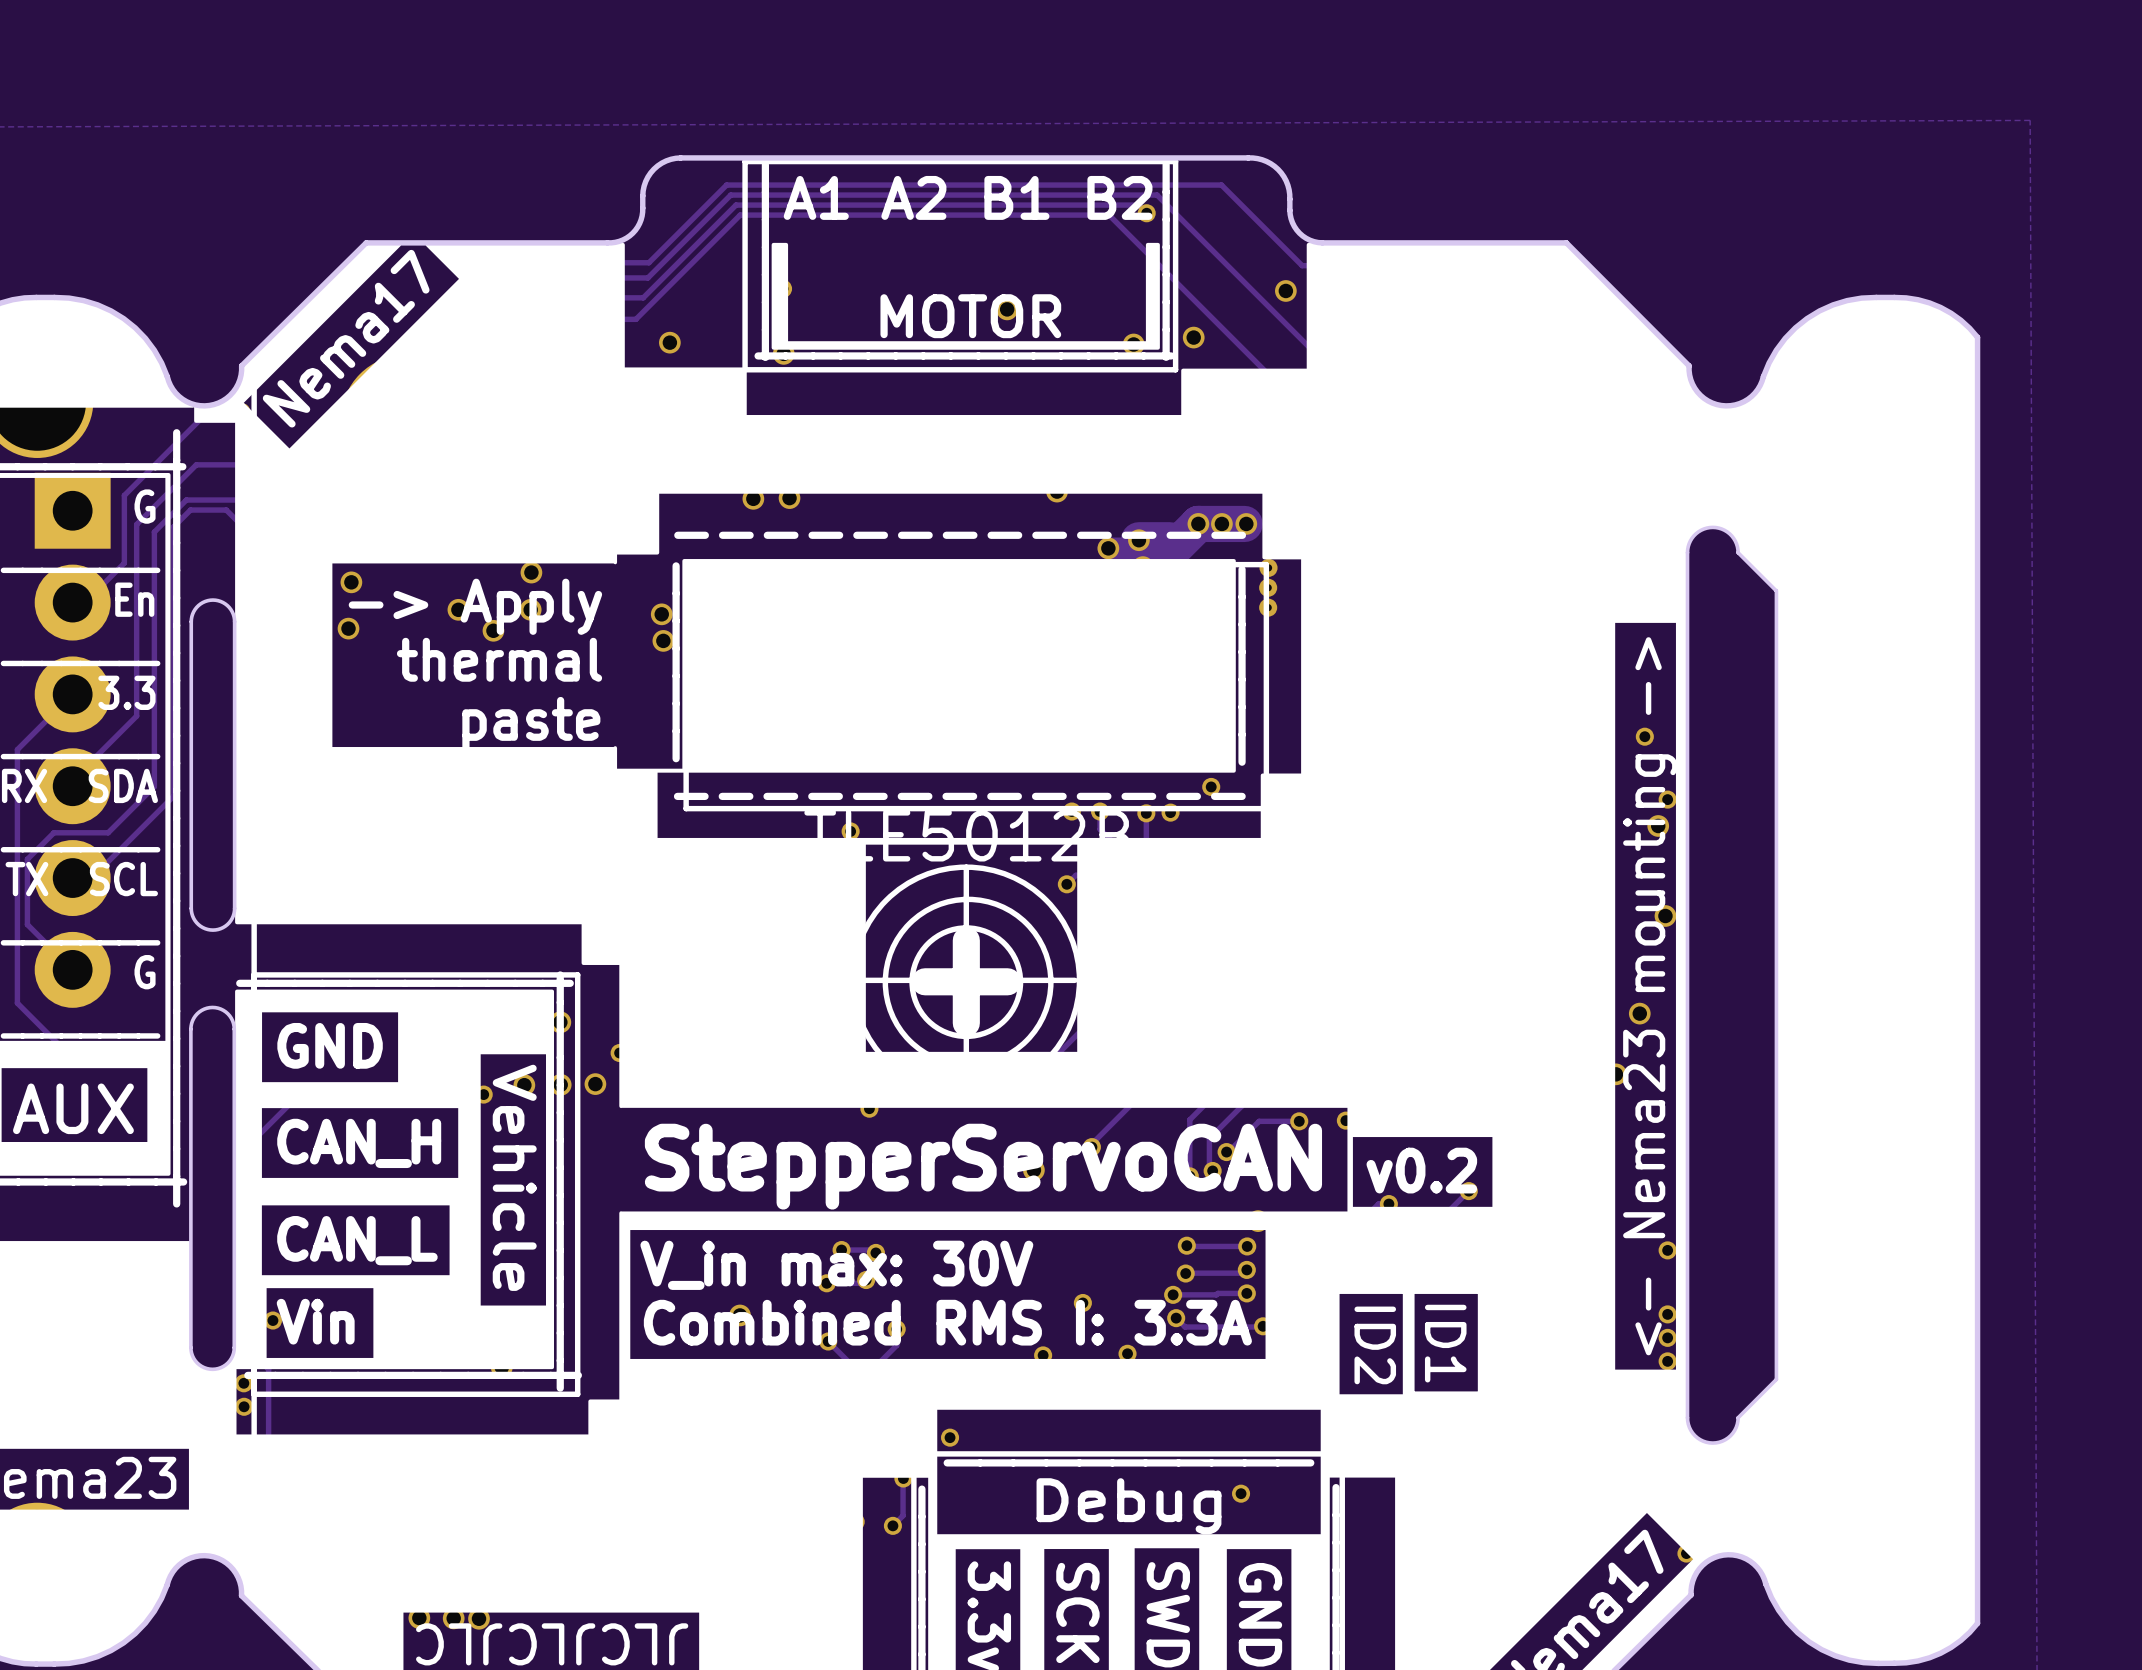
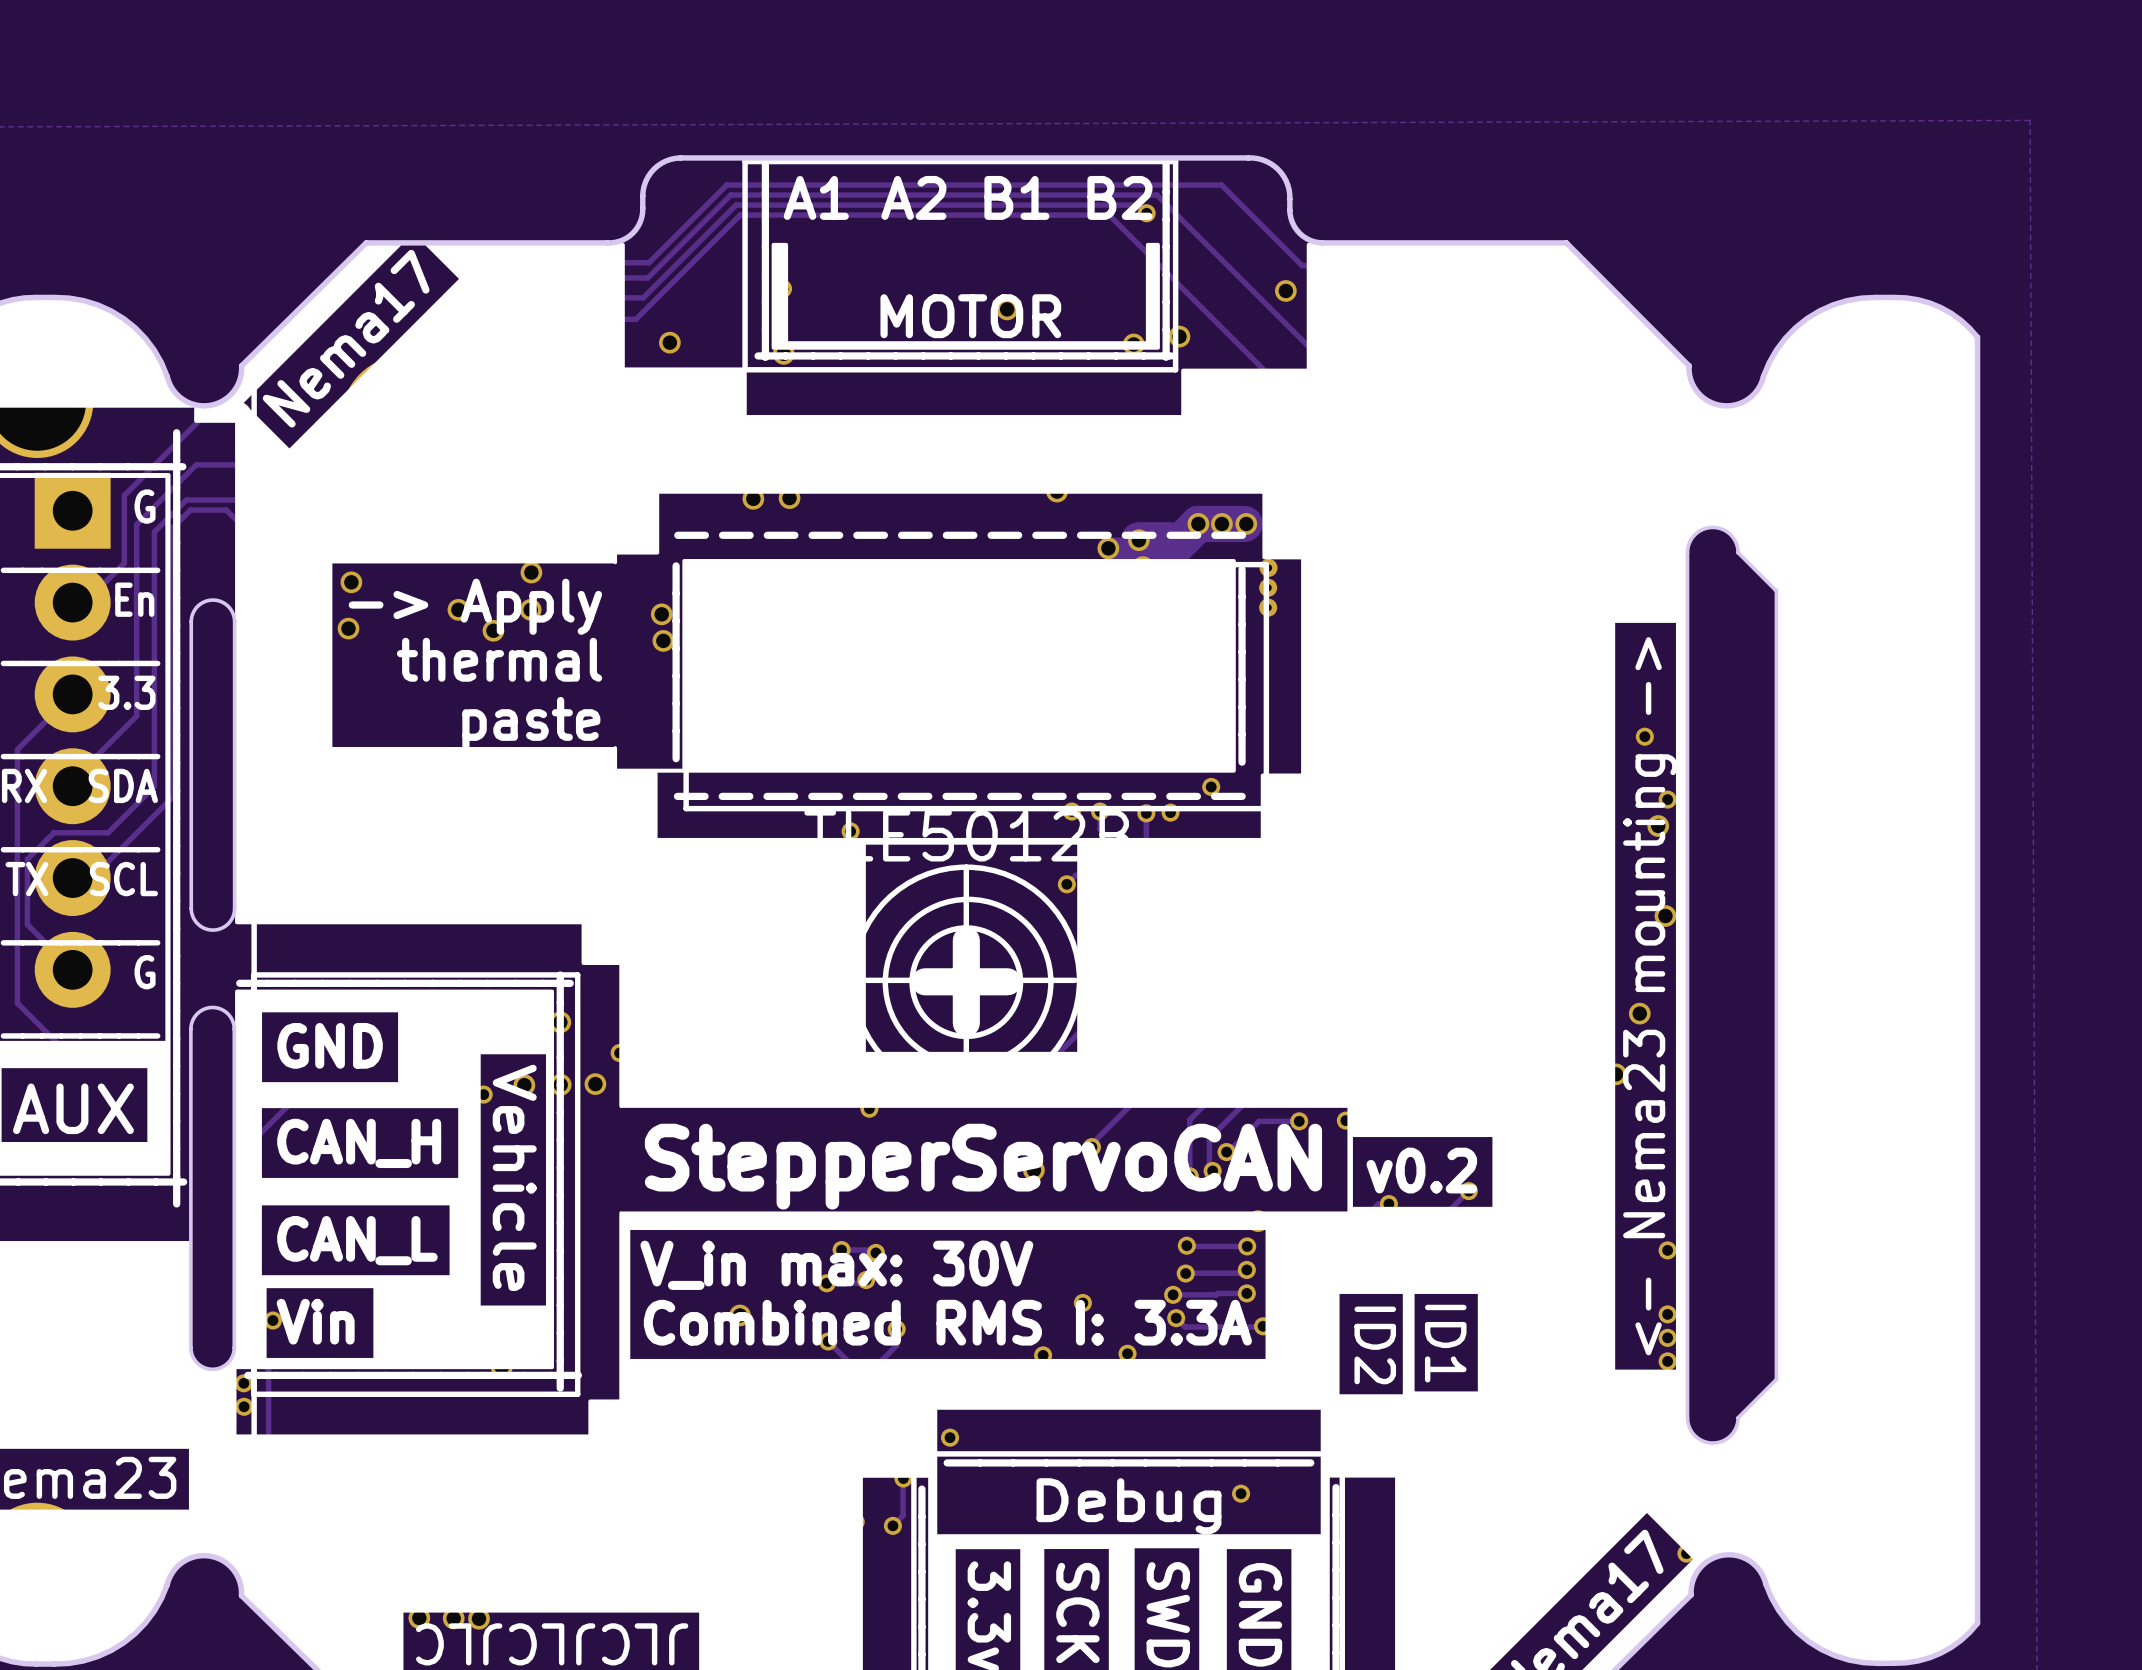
via position: (1193, 337) -> (1179, 336)

